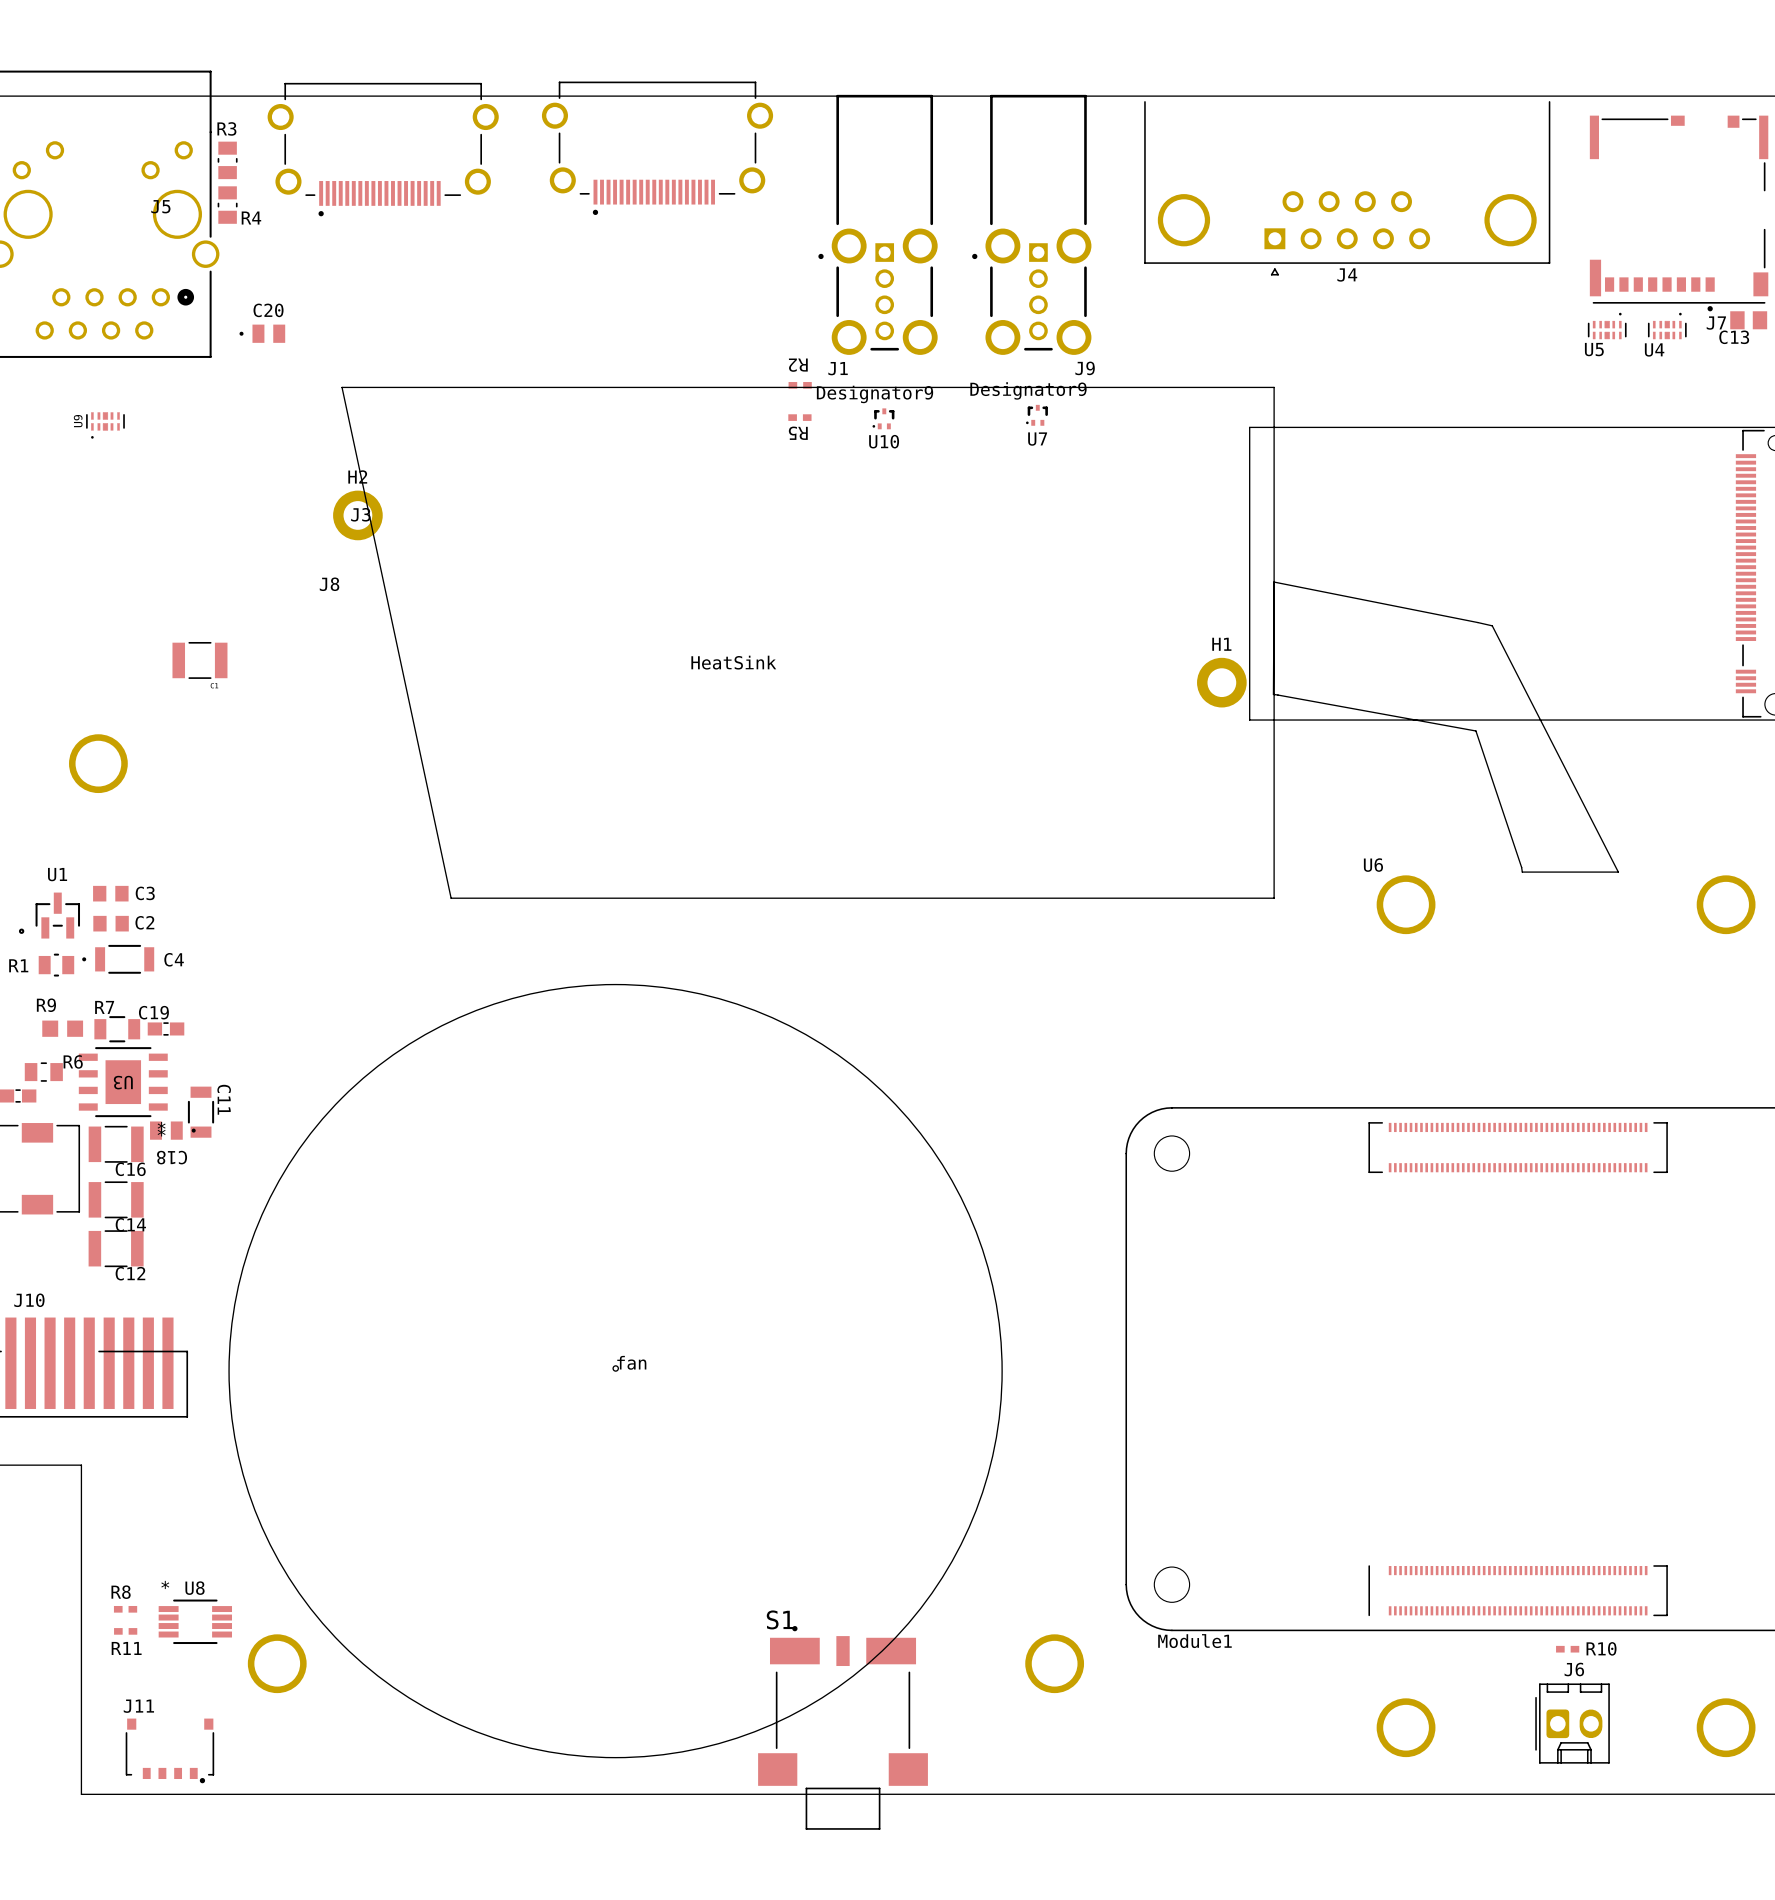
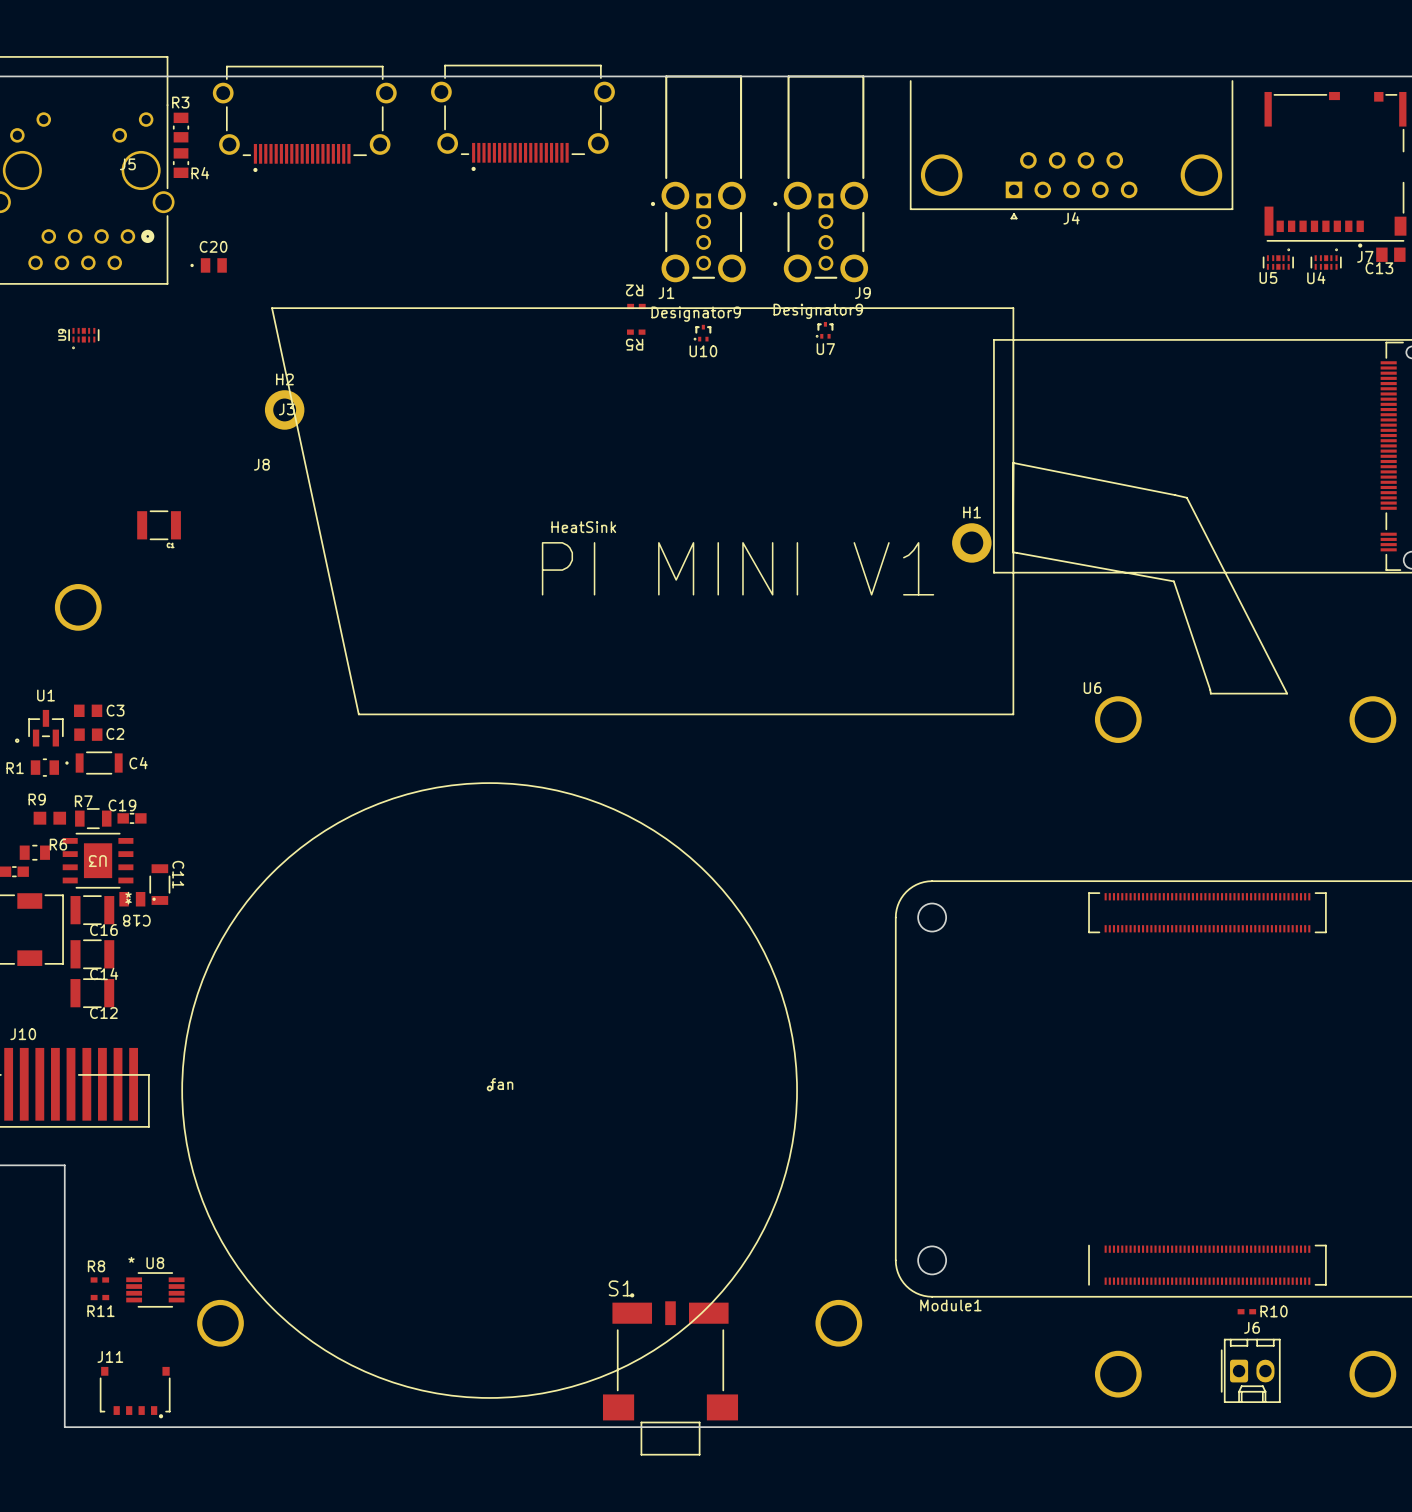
text: none -> PI MINI V1 (738, 568)

